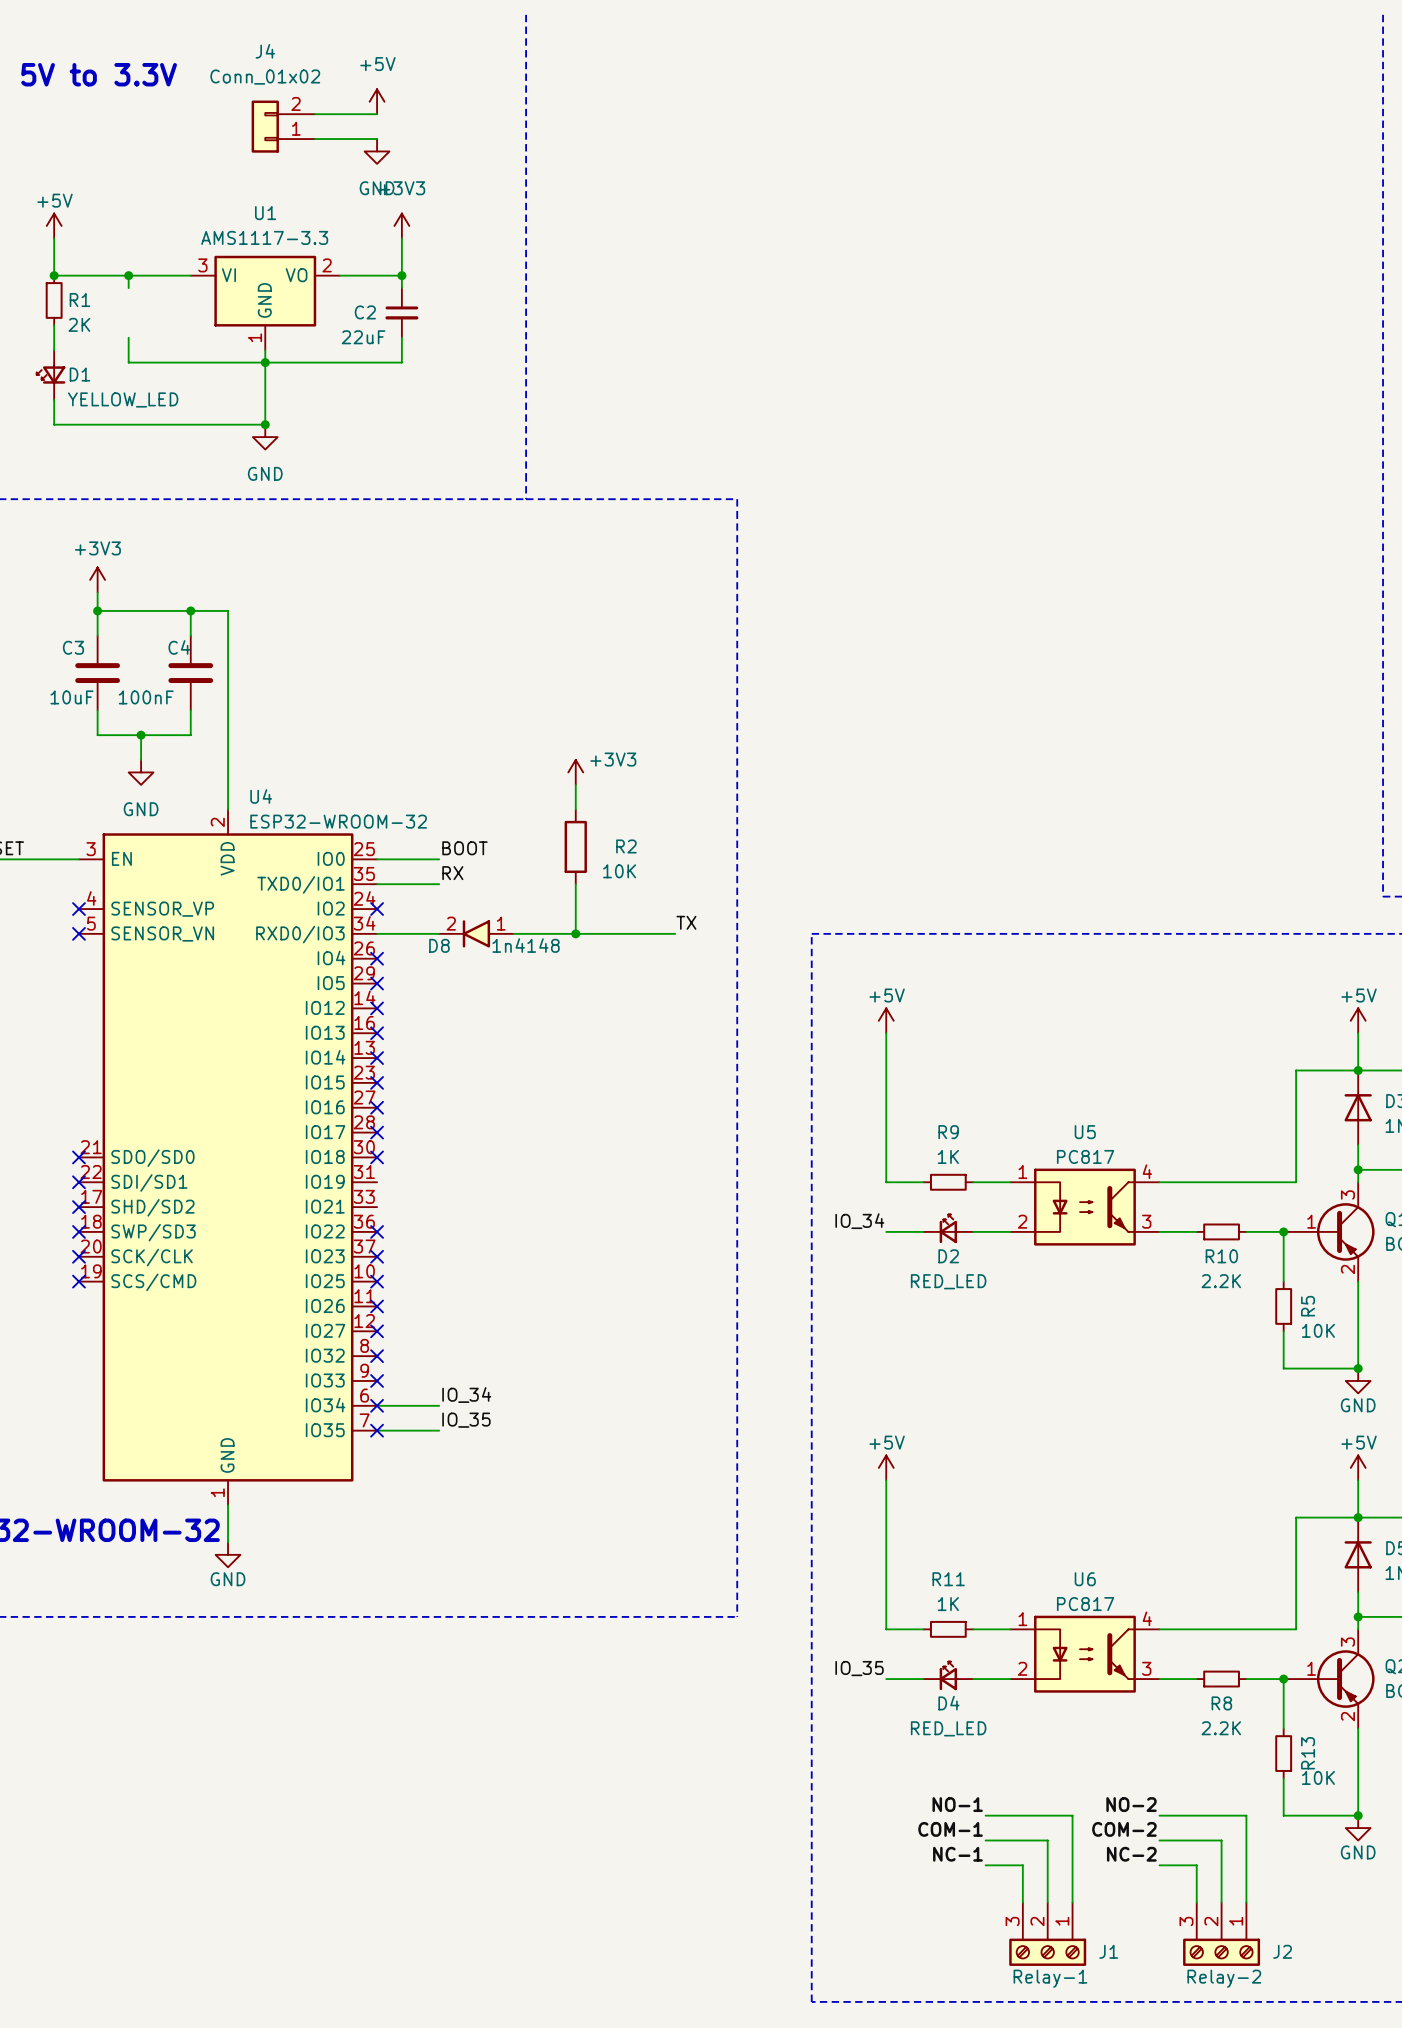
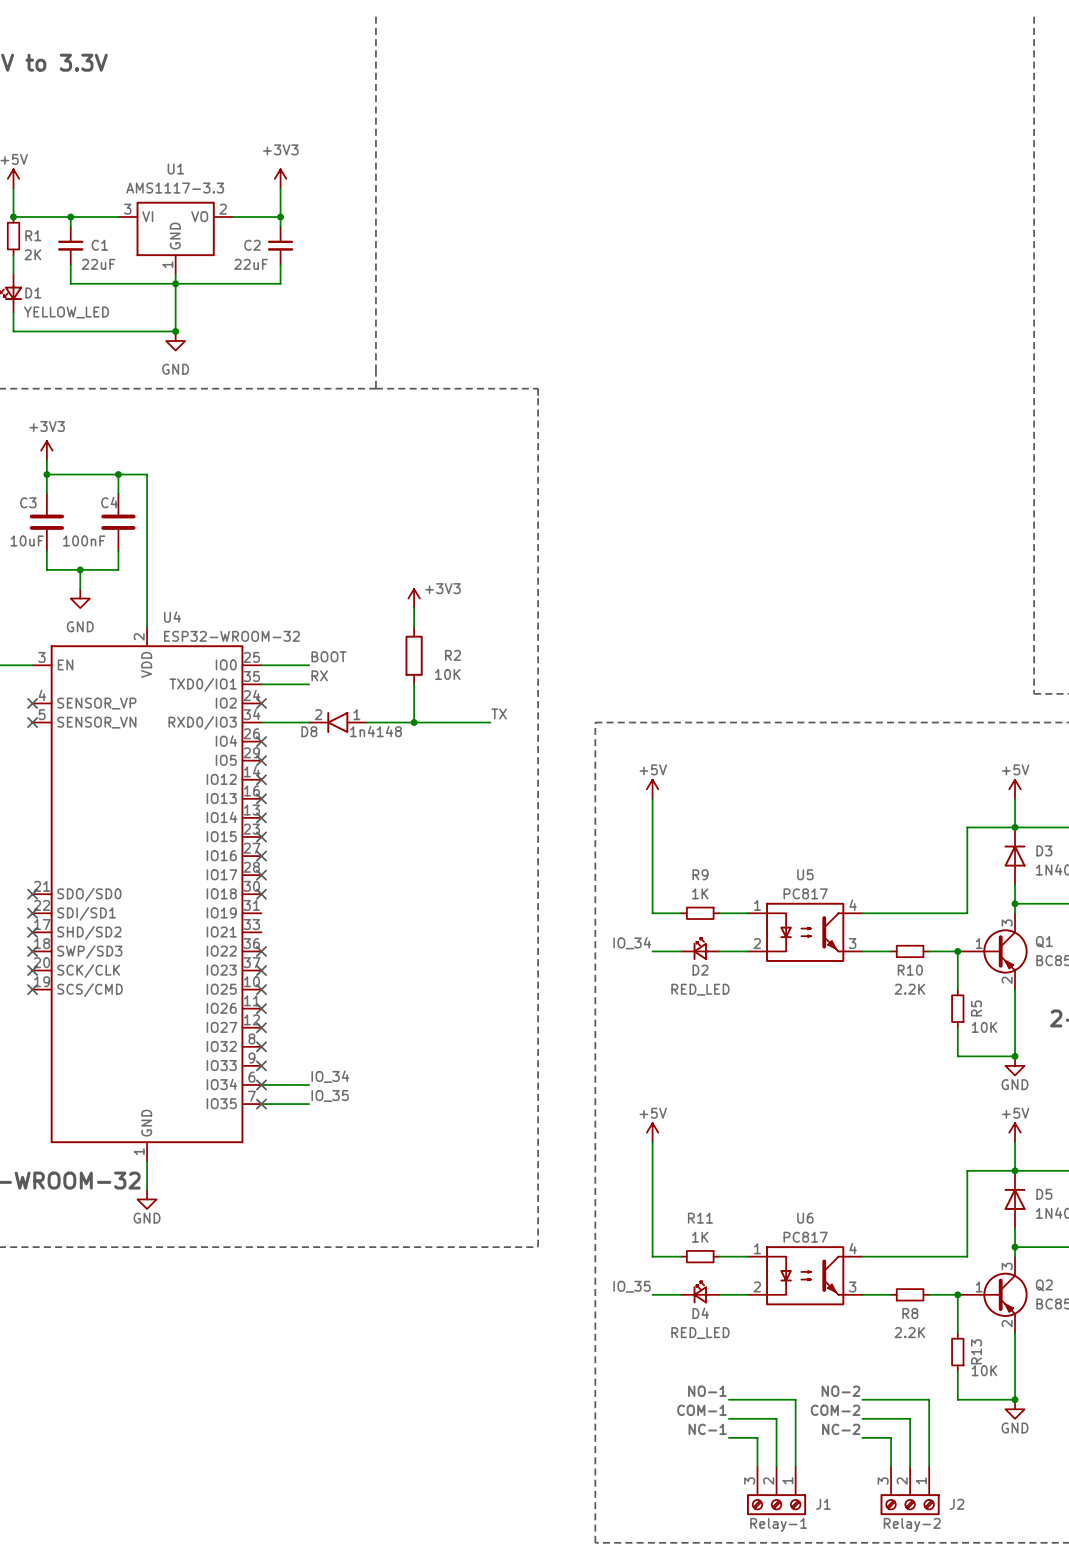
power symbol: +5V (377, 101) -> none
wire: (314, 114) (377, 114) -> none
J4: Conn_01x02 (283, 126) -> none
wire: (314, 139) (377, 139) -> none
power symbol: GND (377, 151) -> none
C1: none -> 22uF (70, 245)

